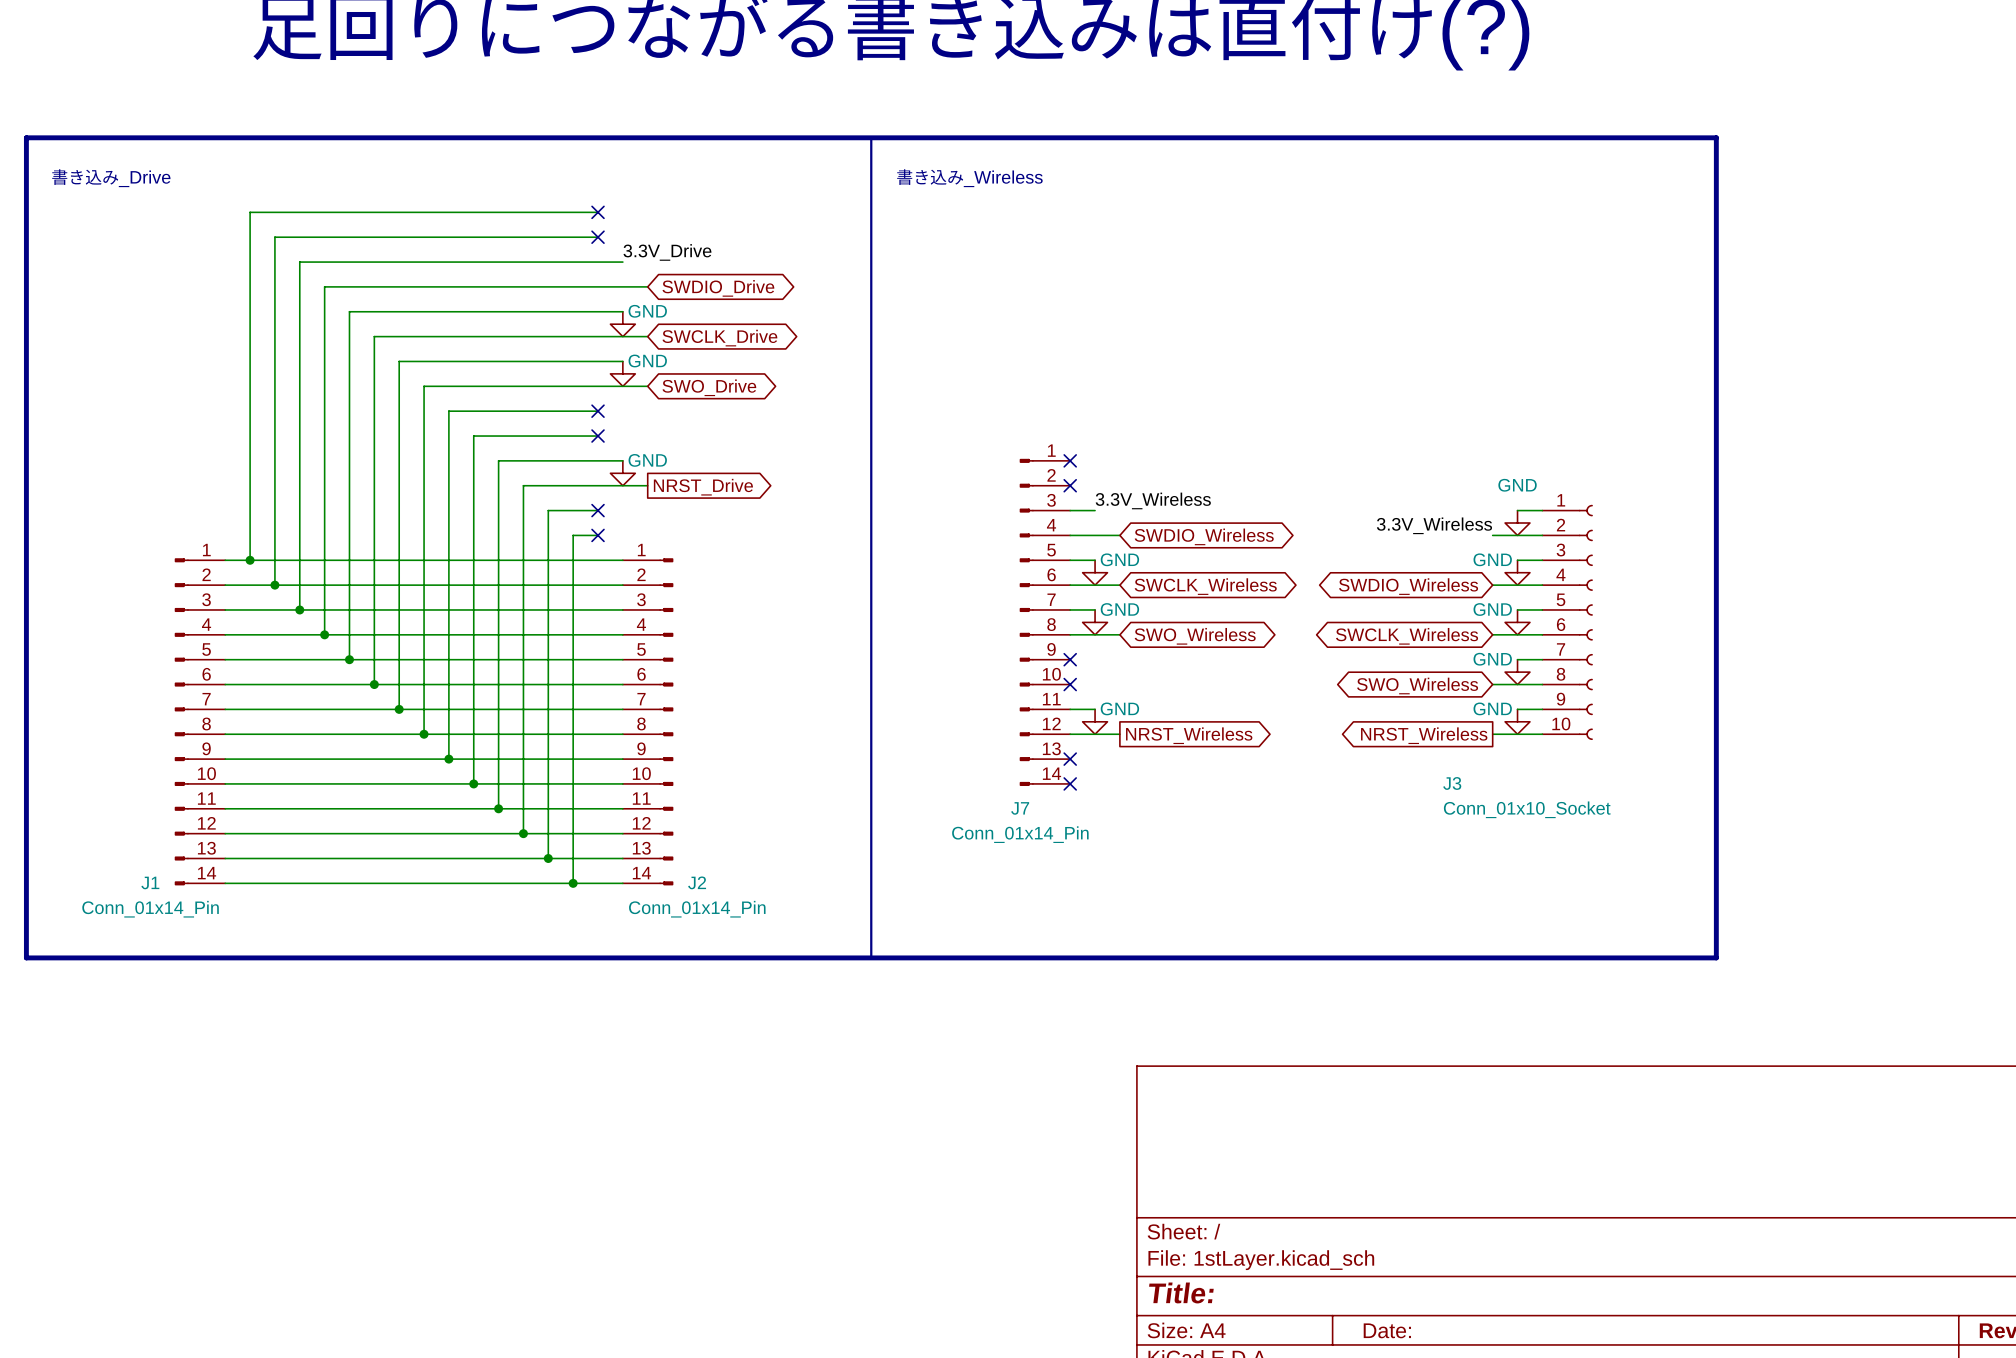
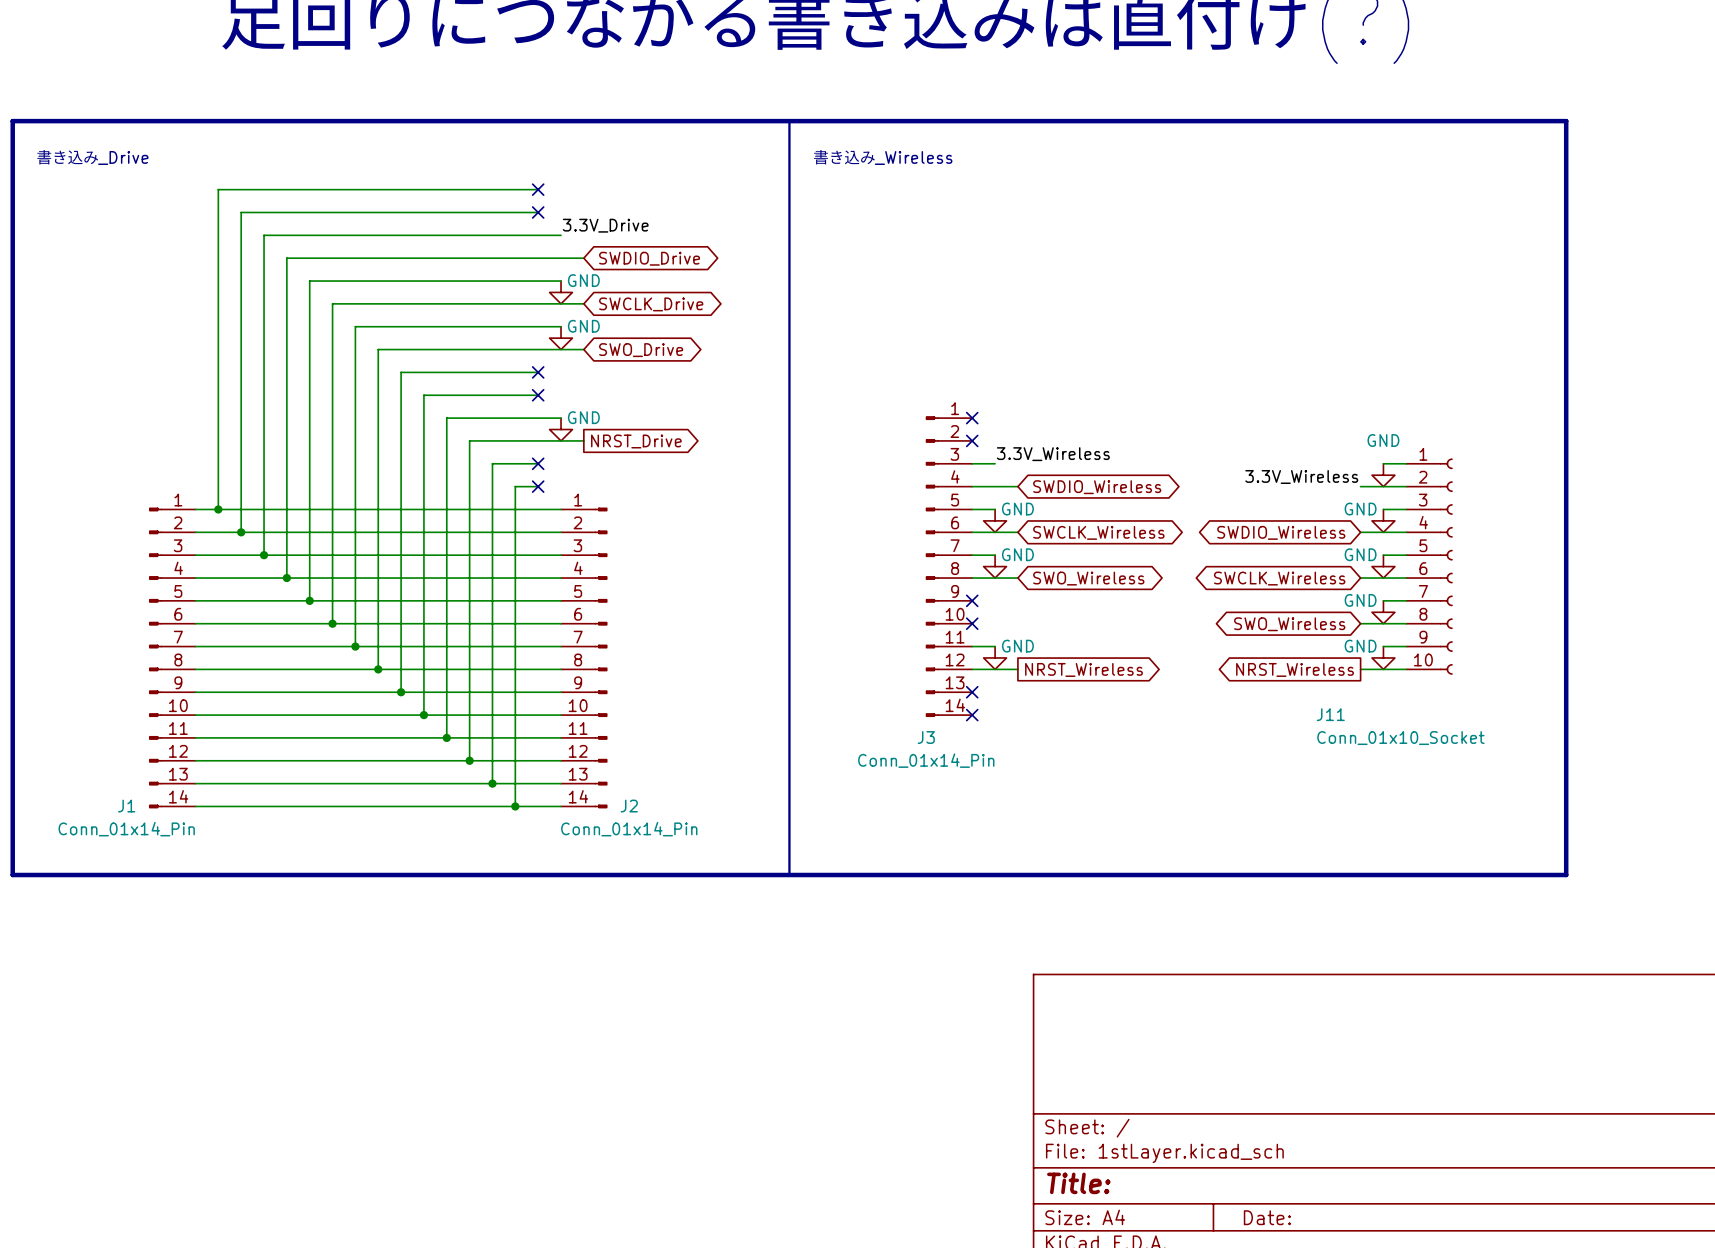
J3 name: J3 (1452, 783) -> J11 (1330, 714)
J7 name: J7 (1020, 808) -> J3 (926, 737)

